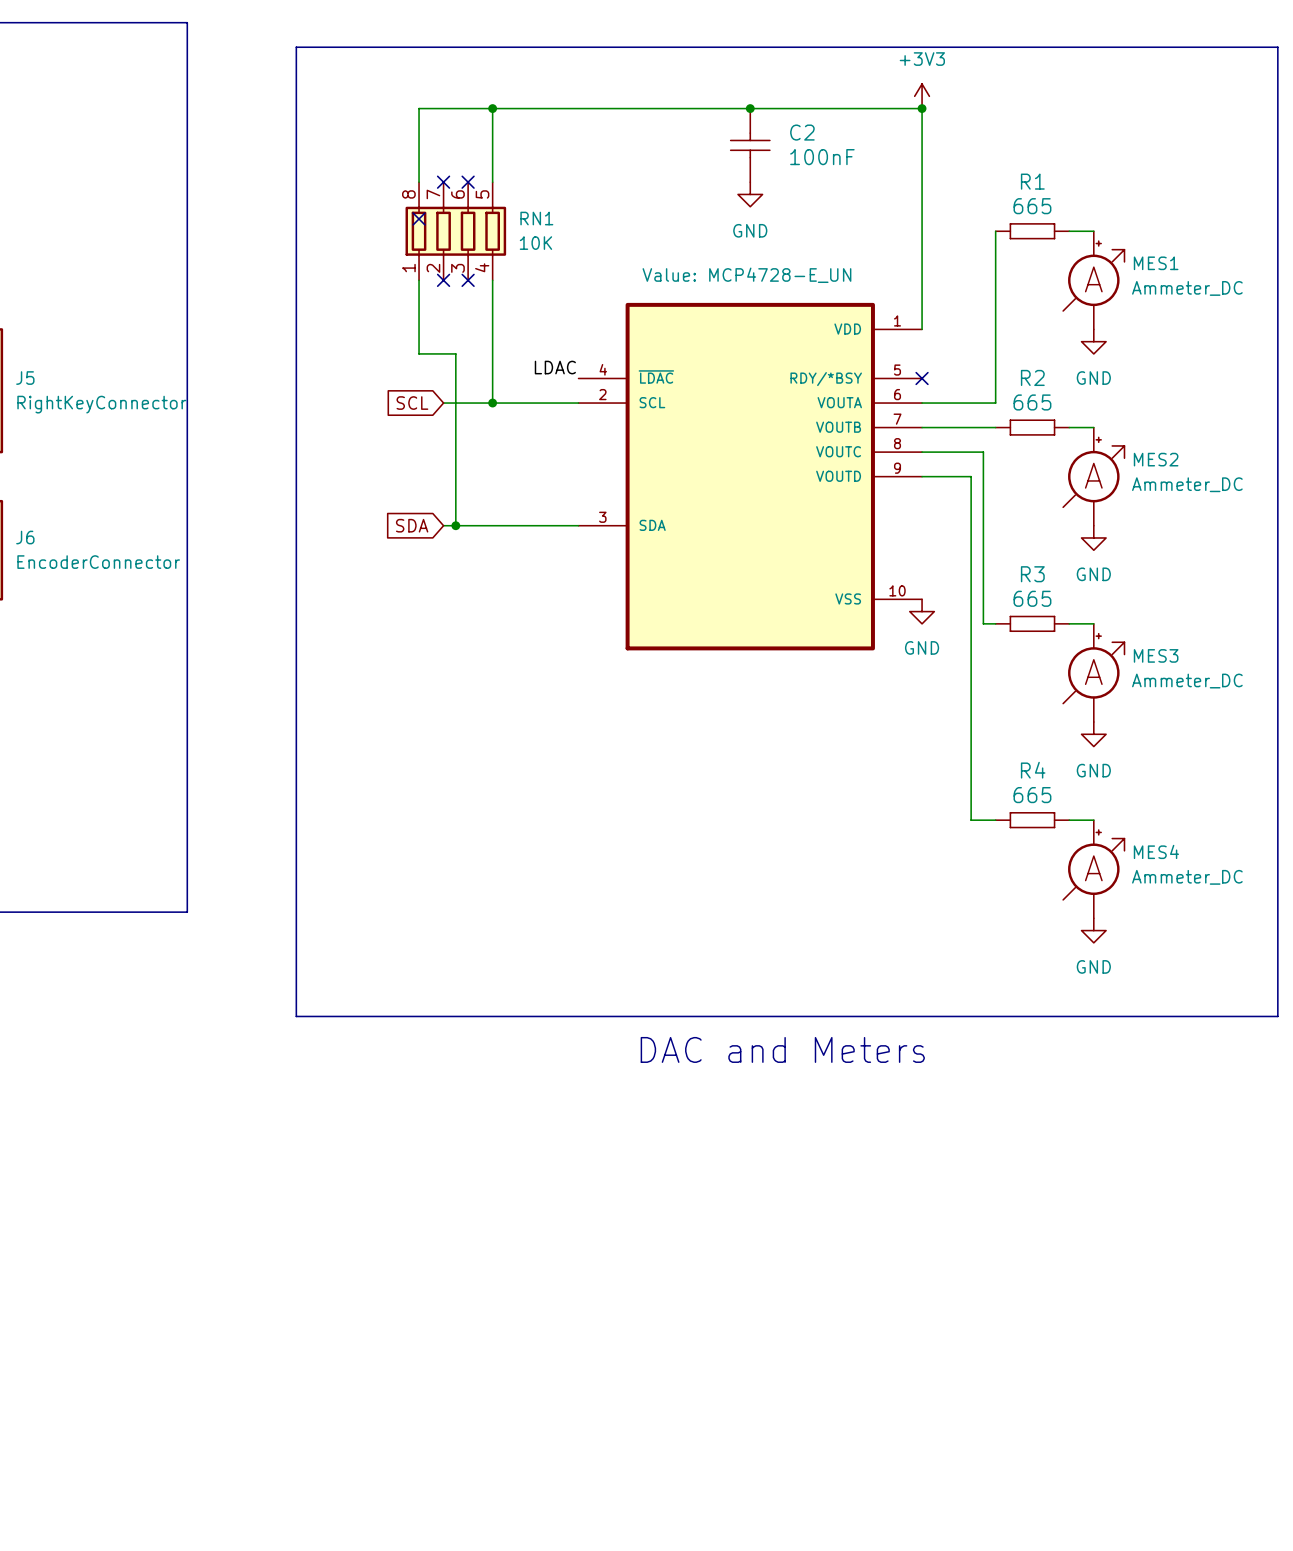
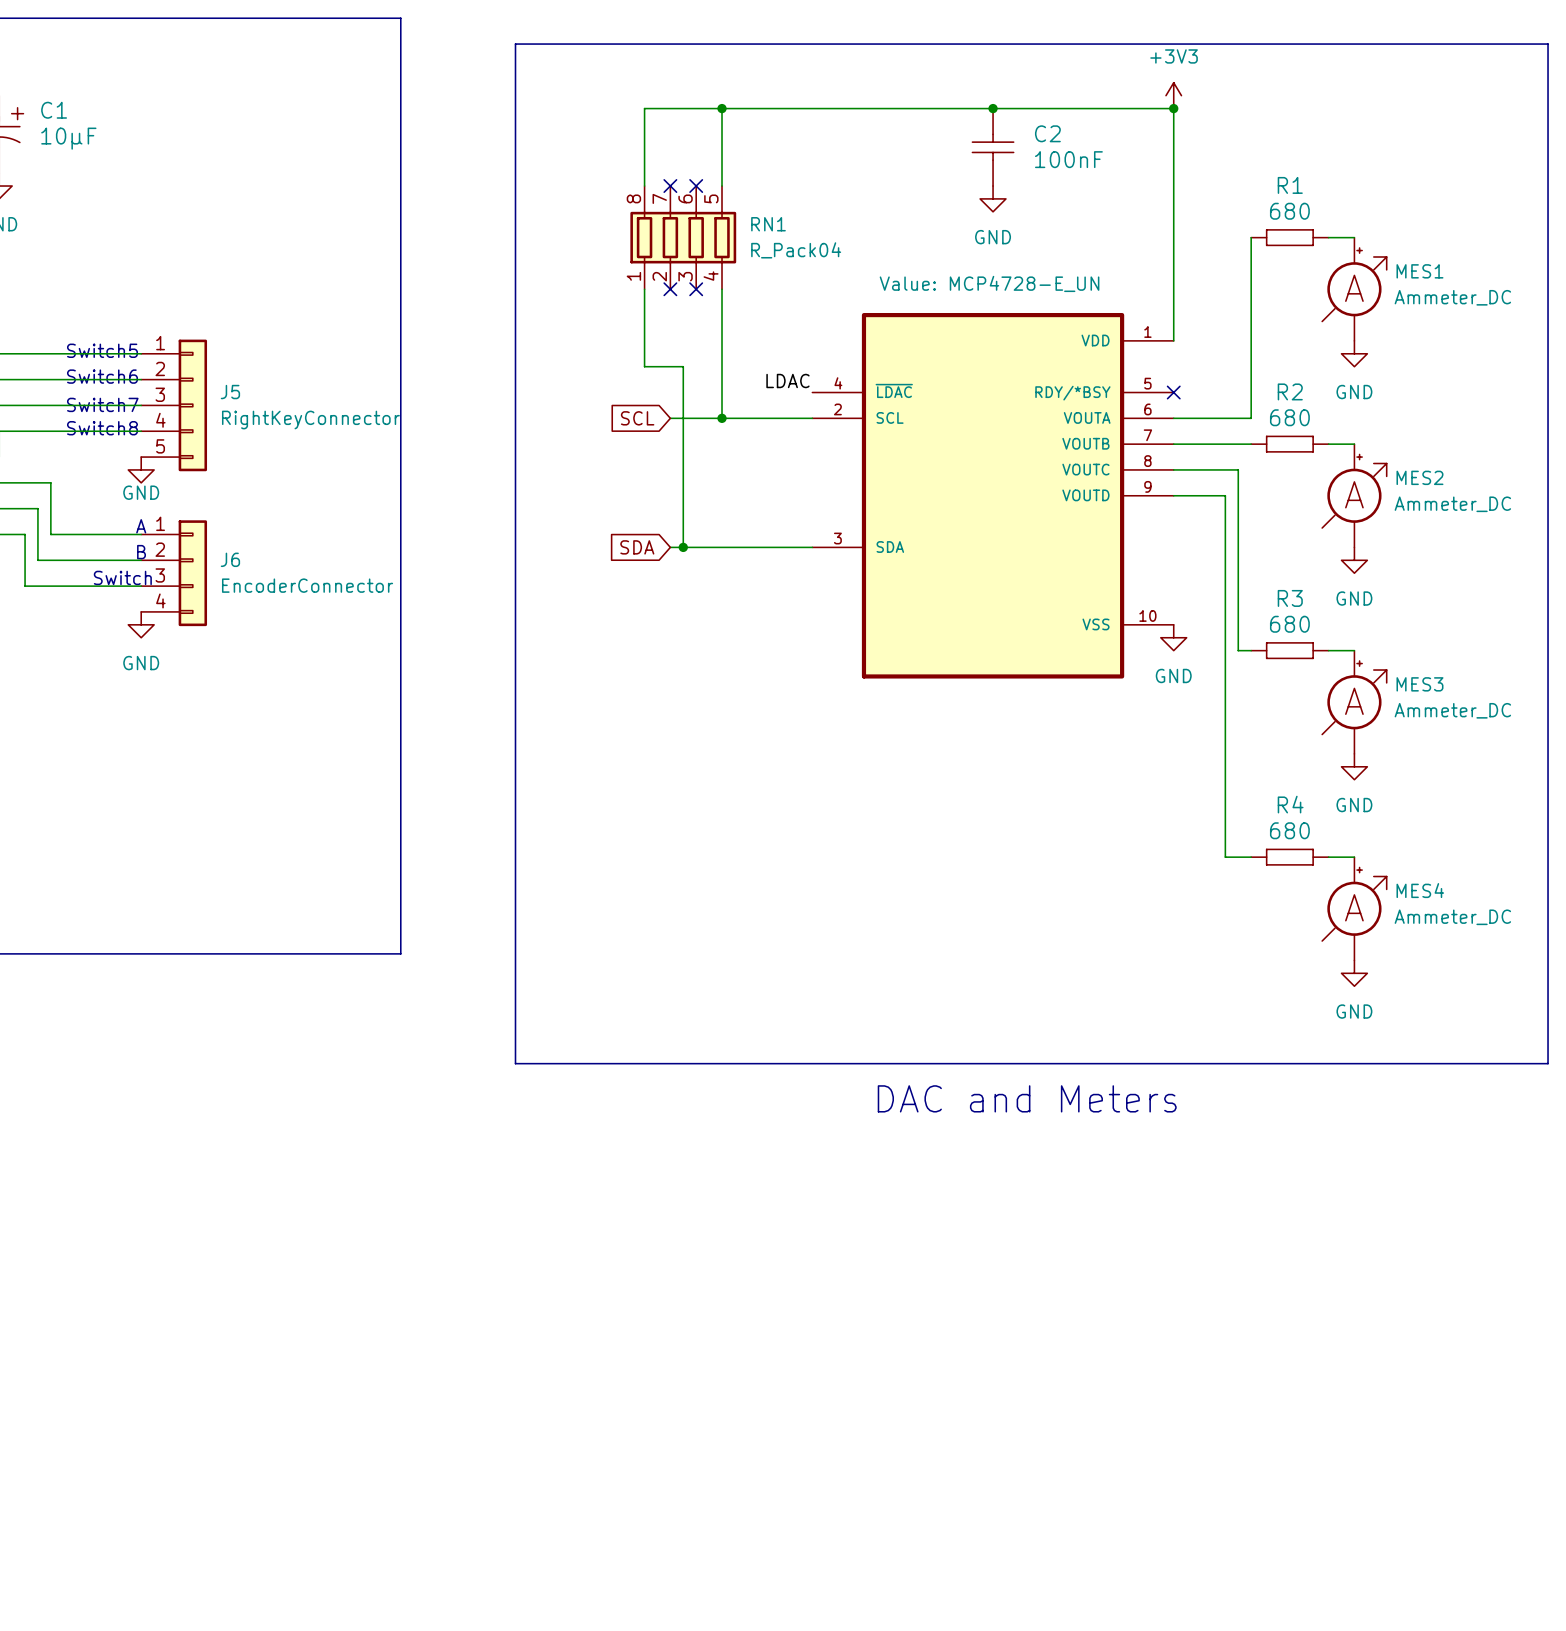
R1 value: 665 (1032, 206) -> 680 (1289, 211)
no-connect mark: (419, 218) -> none
RN1 value: 10K (535, 243) -> R_Pack04 (796, 250)
R2 value: 665 (1032, 402) -> 680 (1289, 417)
R3 value: 665 (1032, 598) -> 680 (1289, 624)
R4 value: 665 (1032, 795) -> 680 (1289, 830)

